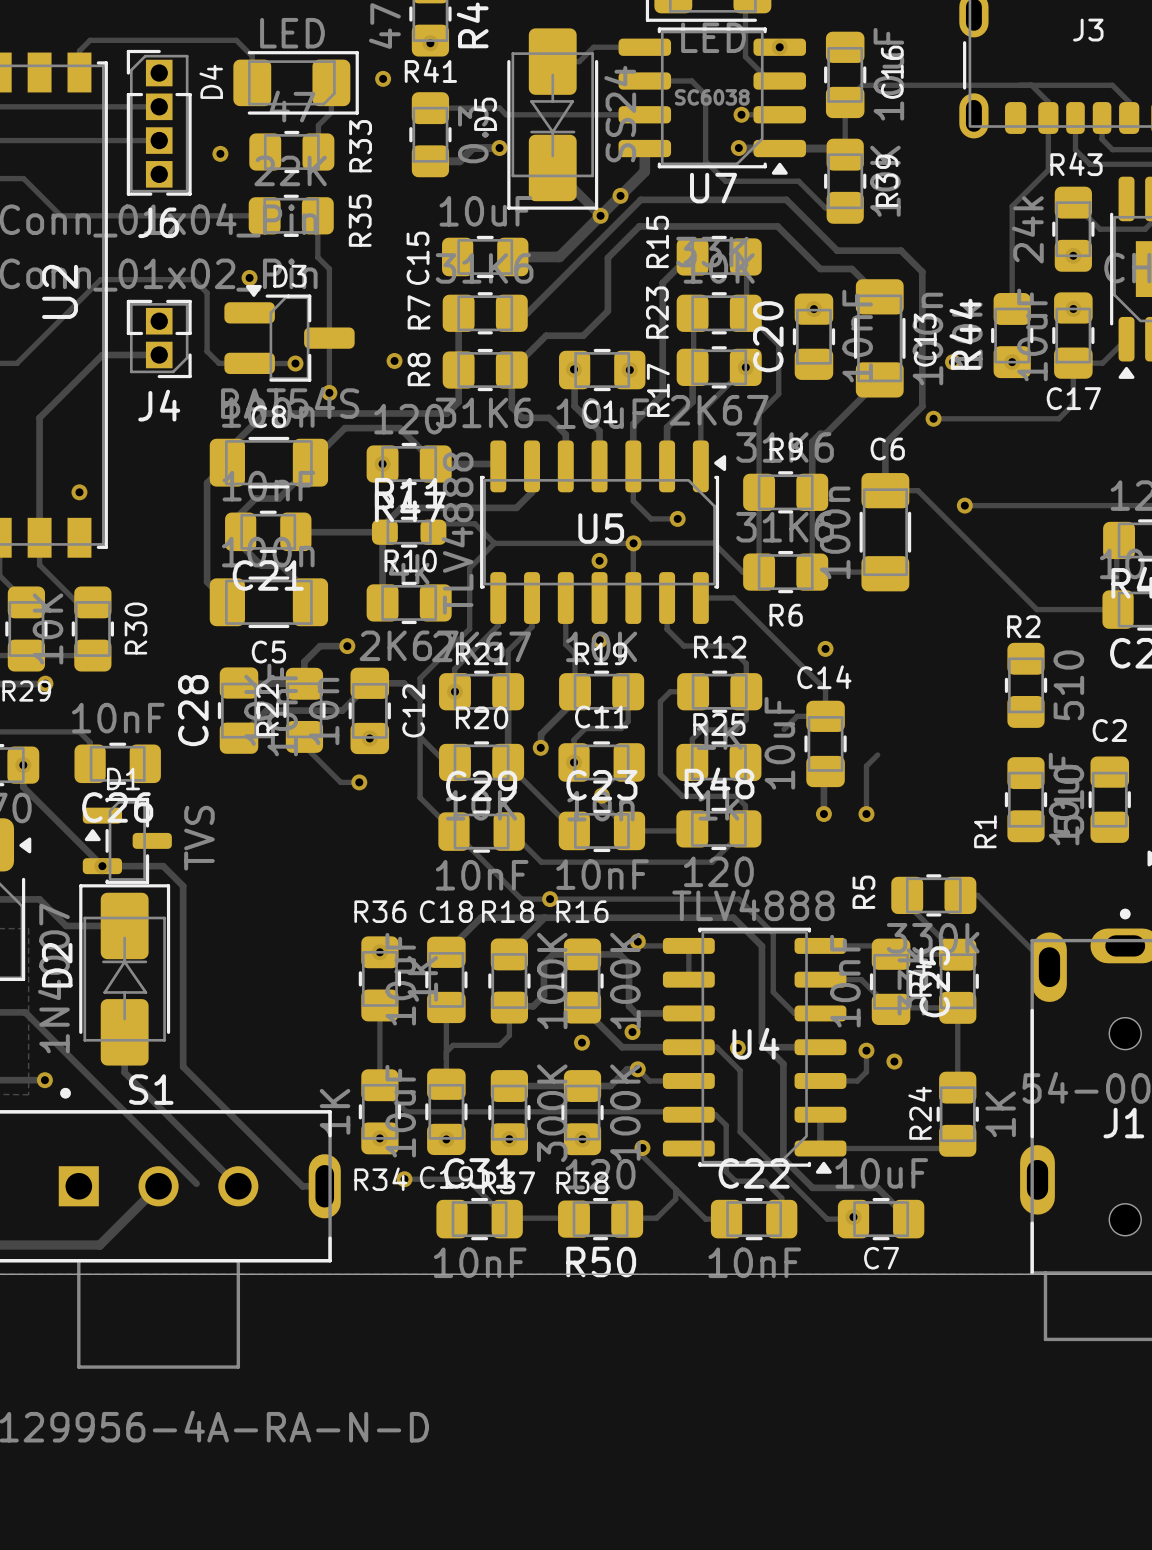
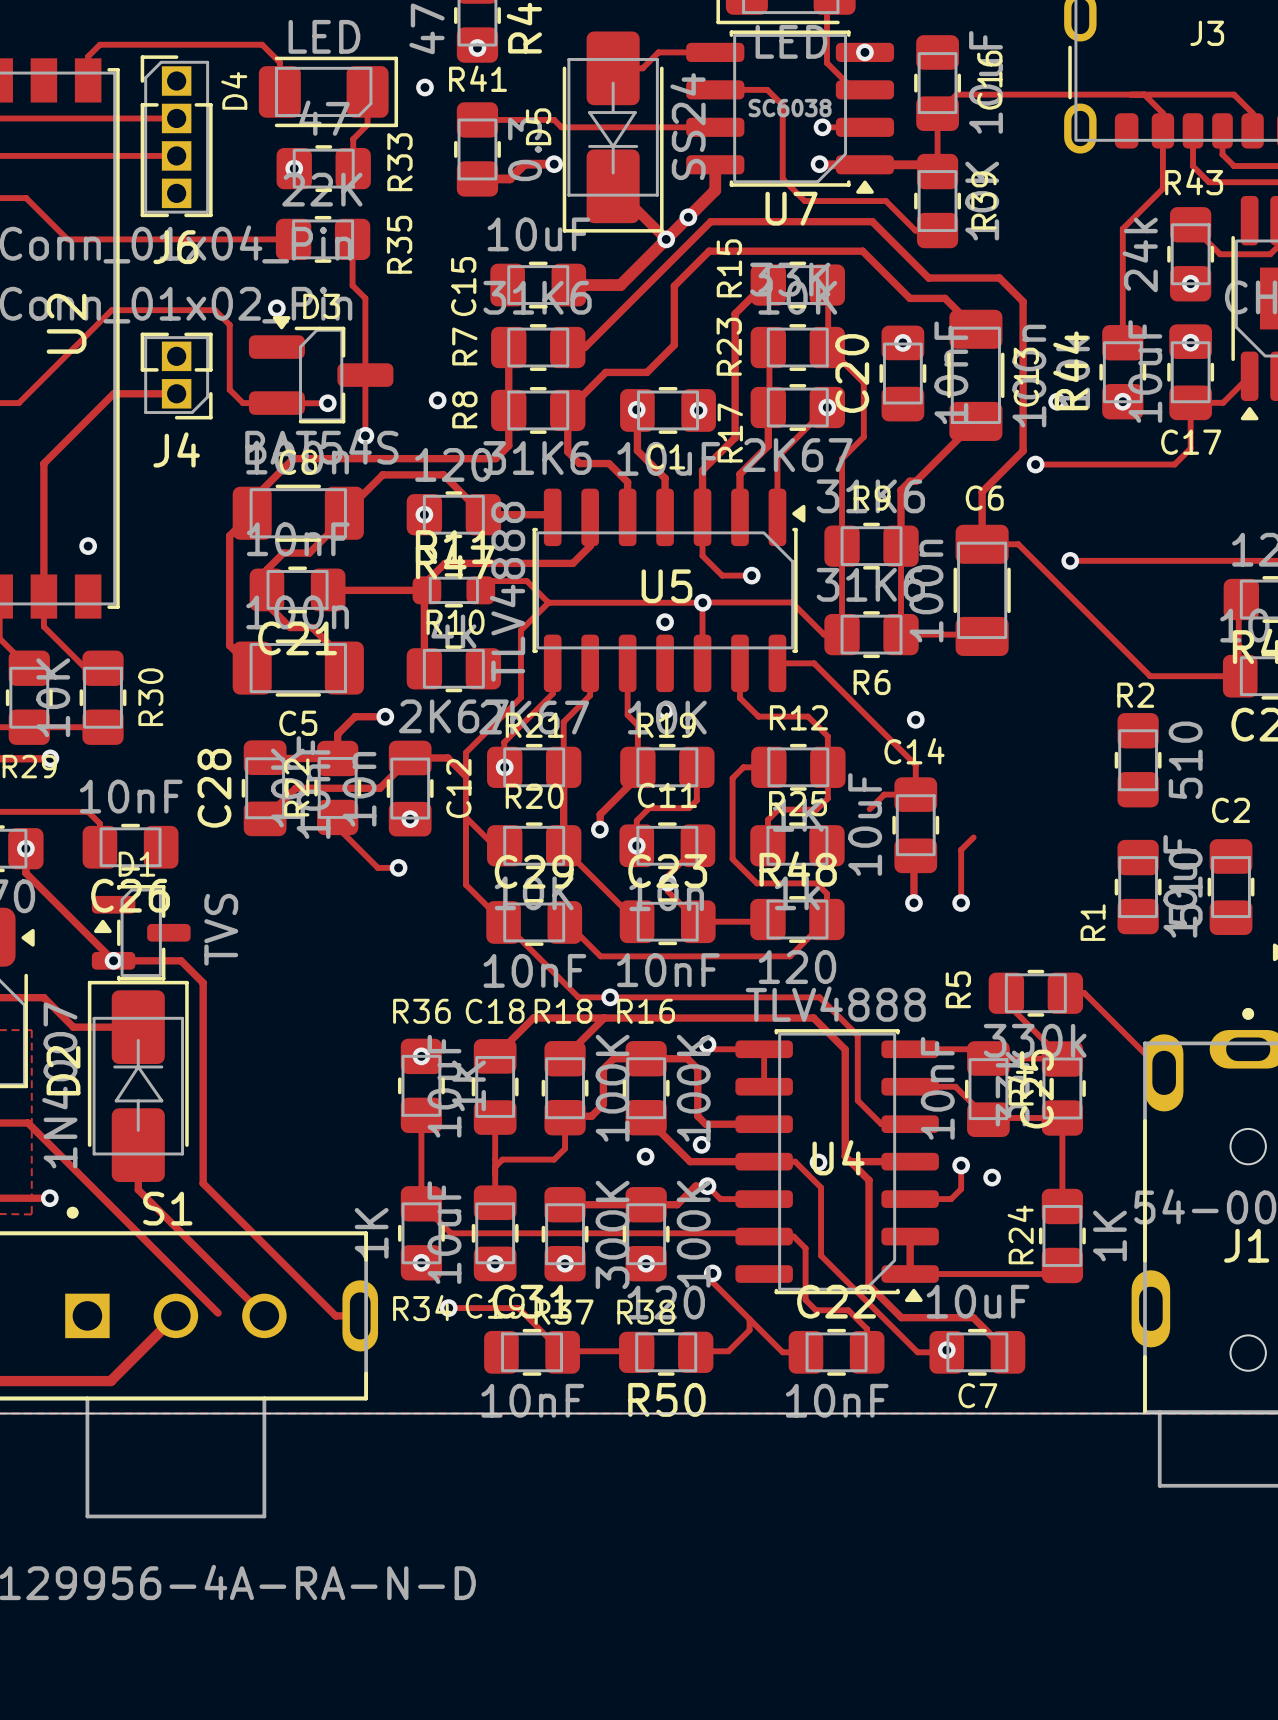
via position: (220, 153) -> (294, 168)

